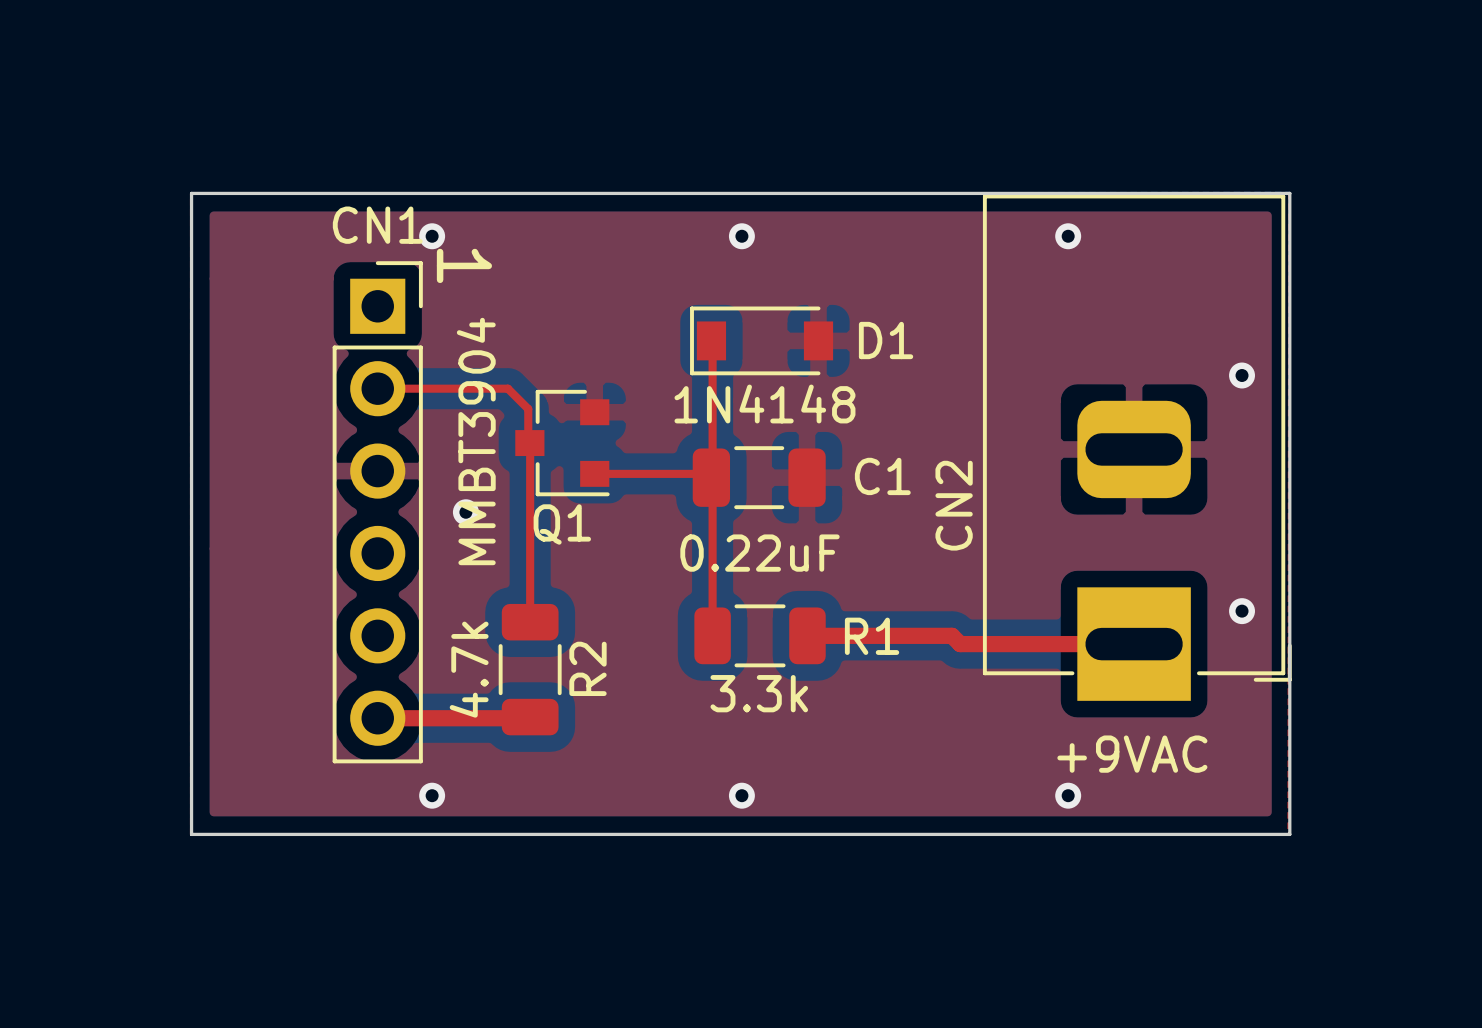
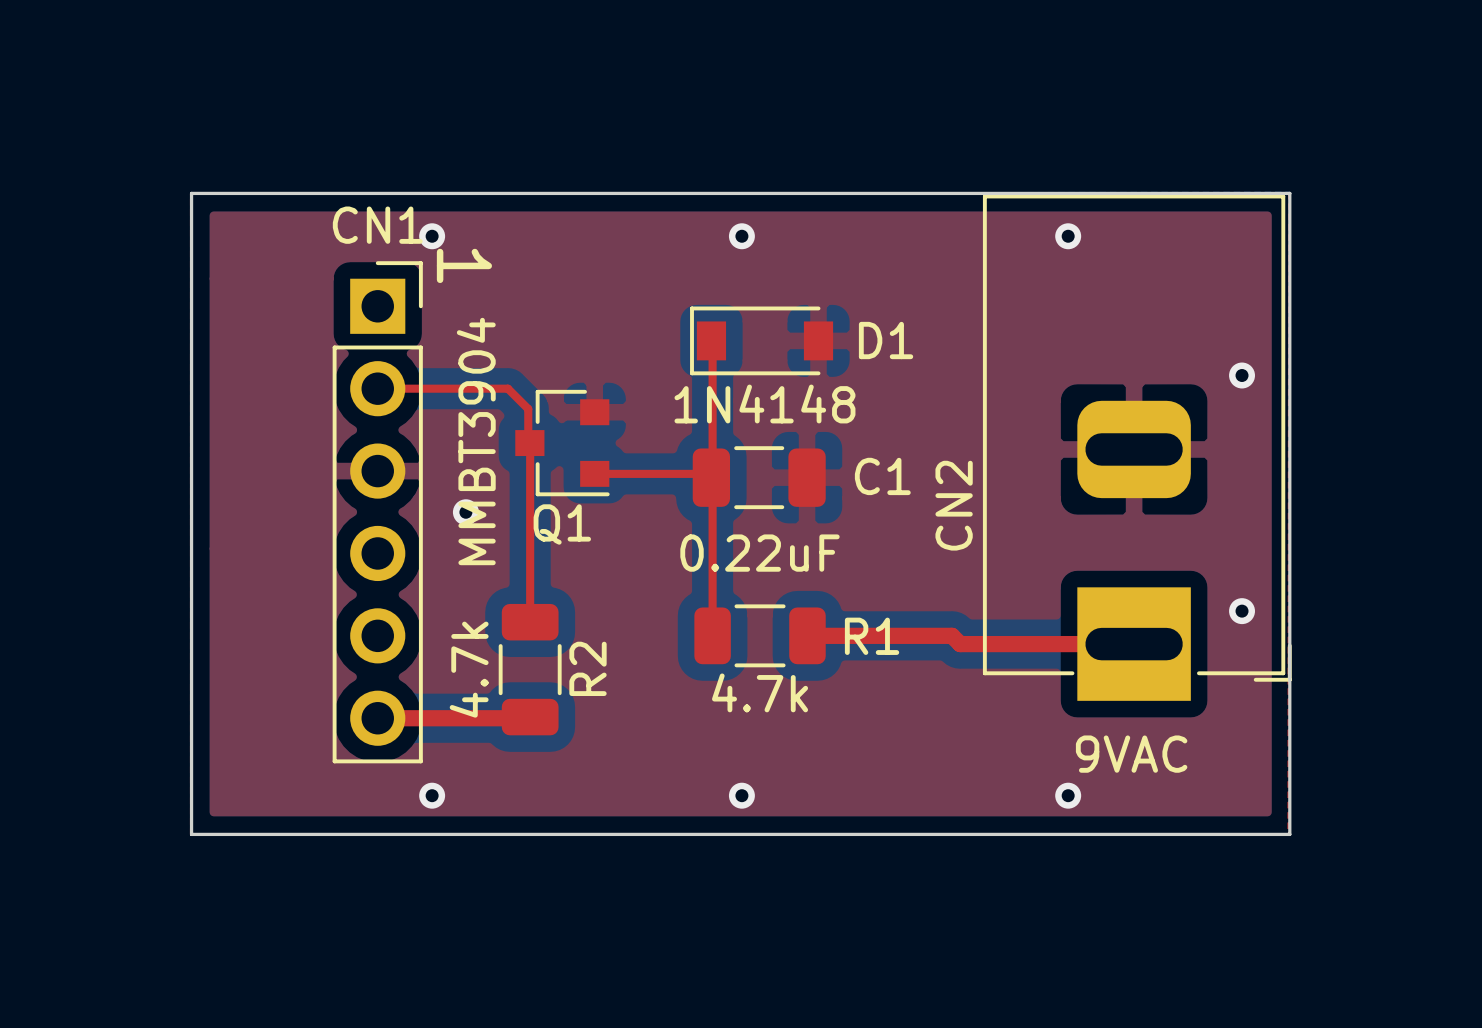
R1 value: 3.3k (759, 693) -> 4.7k (760, 692)
text: +9VAC (1132, 754) -> 9VAC (1131, 754)

